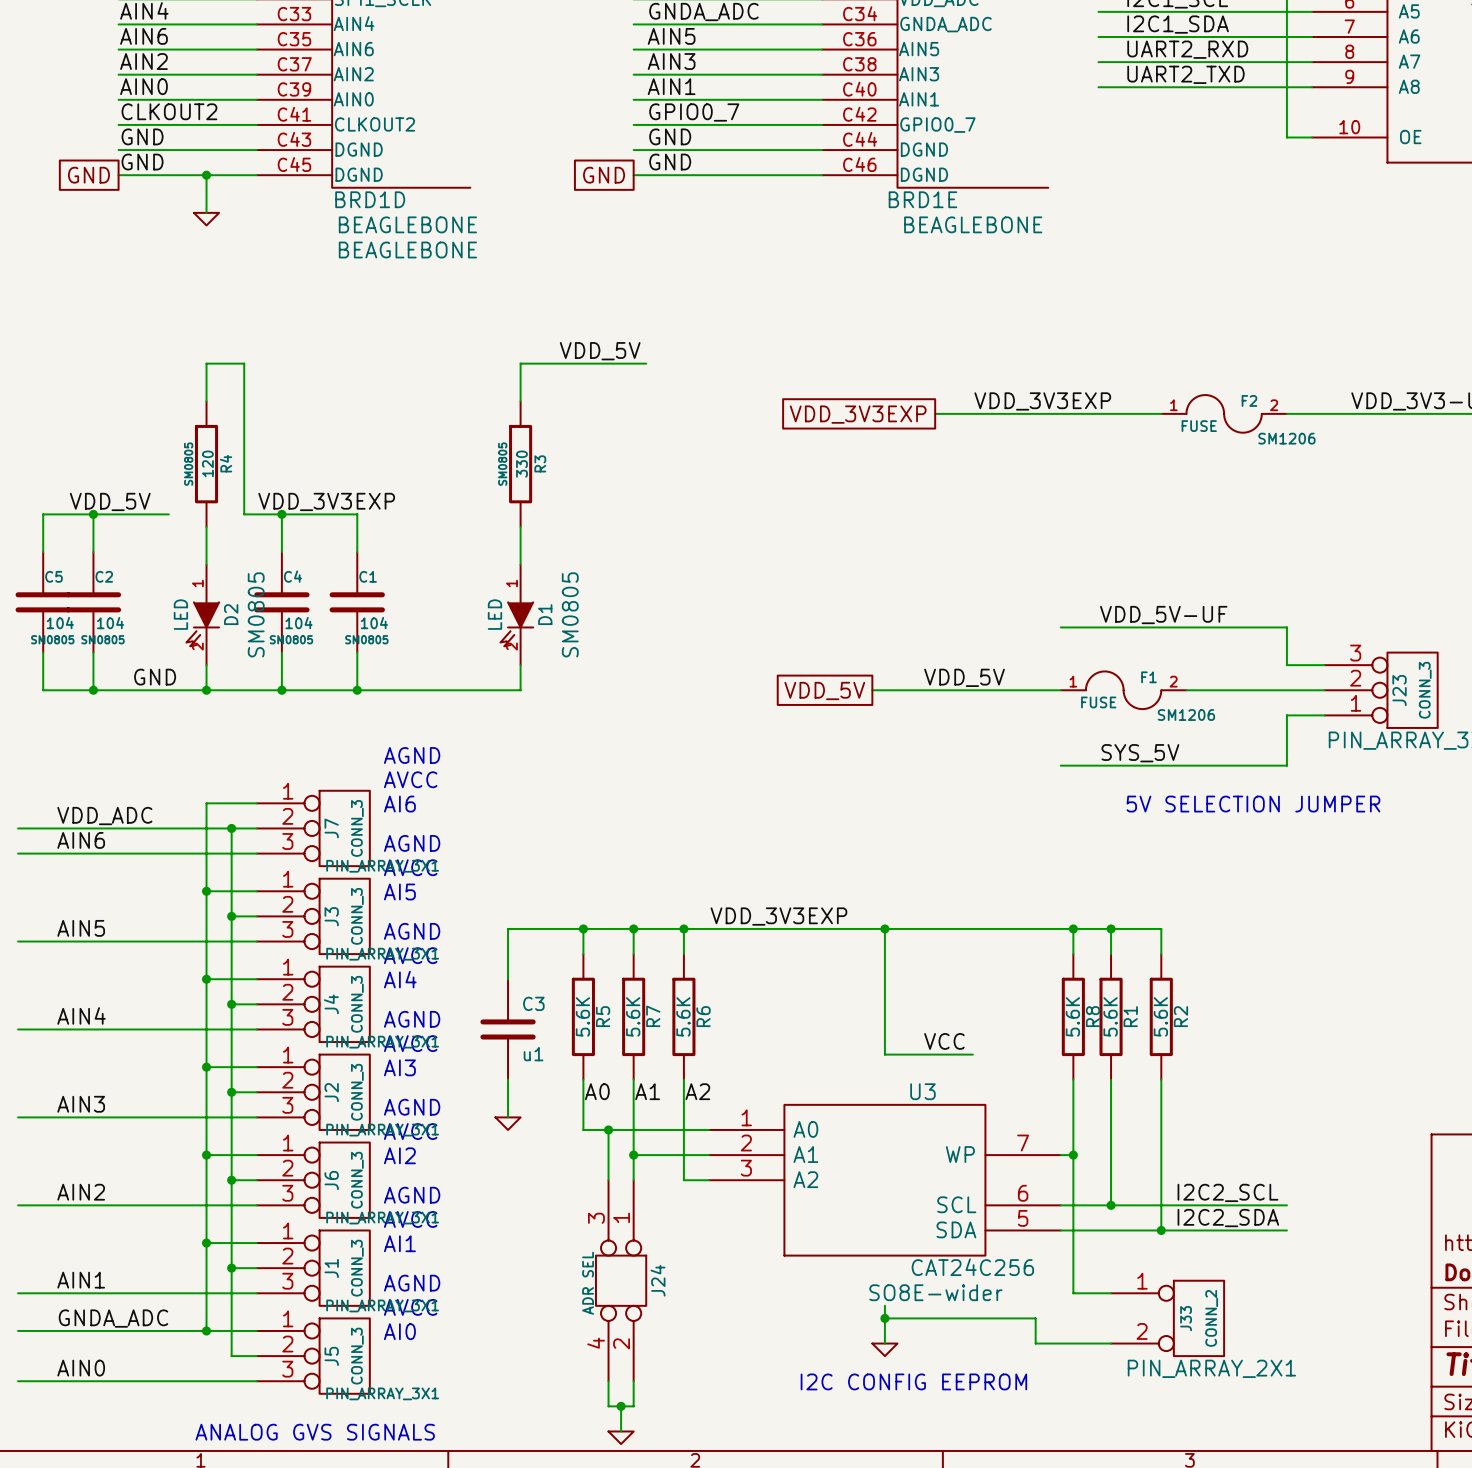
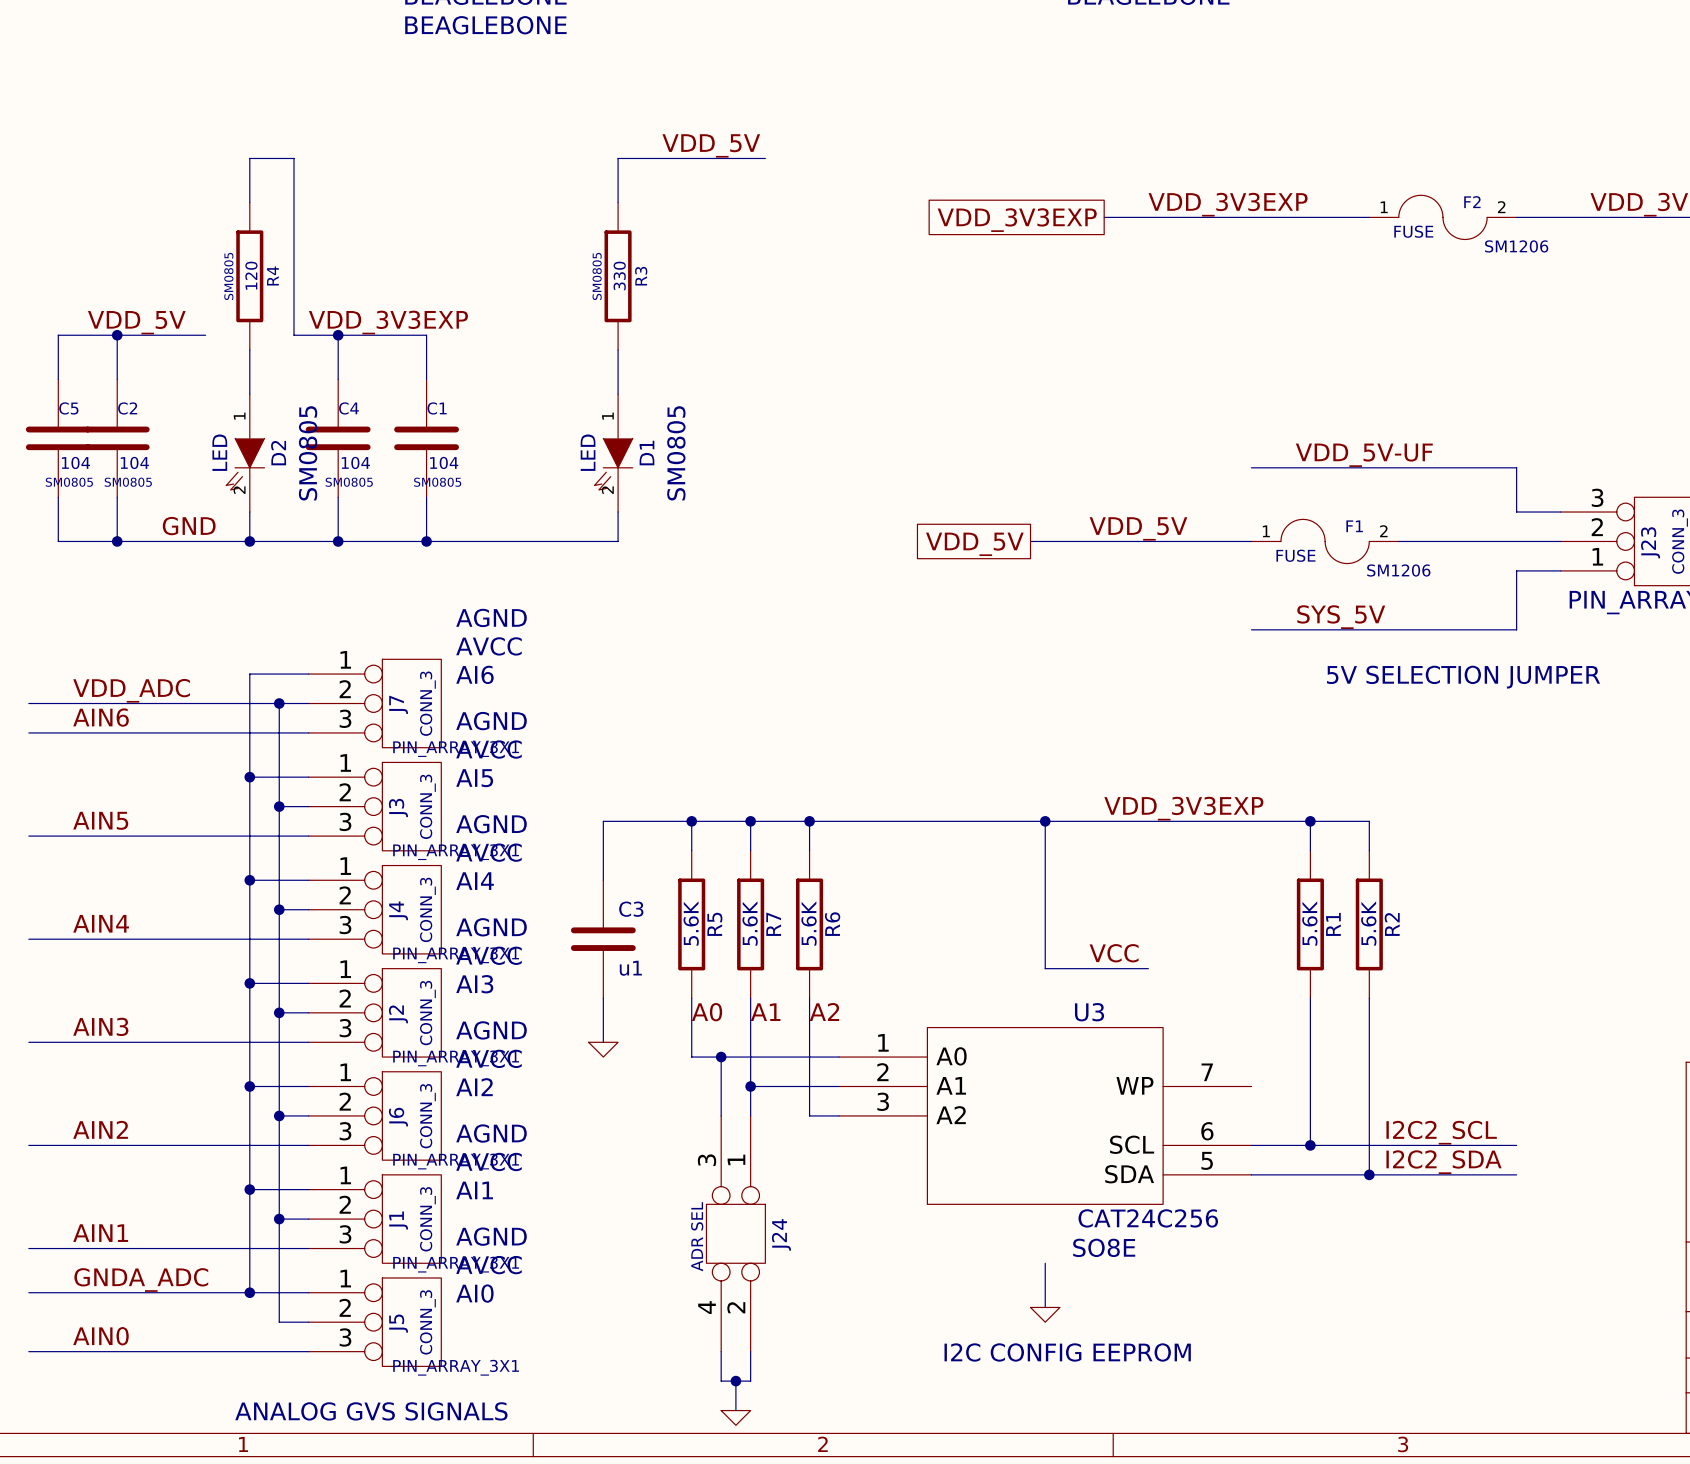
label position: VDD_3V3EXP (778, 916) -> VDD_3V3EXP (1183, 808)
wire: (1073, 928) (1073, 954) -> none
junction: (1073, 928) -> none
R8: 5.6K (1073, 1016) -> none
wire: (1073, 1079) (1073, 1293) (1111, 1293) -> none
wire: (1060, 1155) (1073, 1155) -> none
junction: (1073, 1155) -> none
U3 text: SO8E-wider (935, 1292) -> SO8E (1104, 1247)
wire: (884, 1318) (1035, 1318) (1035, 1343) (1111, 1343) -> none
junction: (884, 1318) -> none
J33: CONN_2 (1167, 1318) -> none

